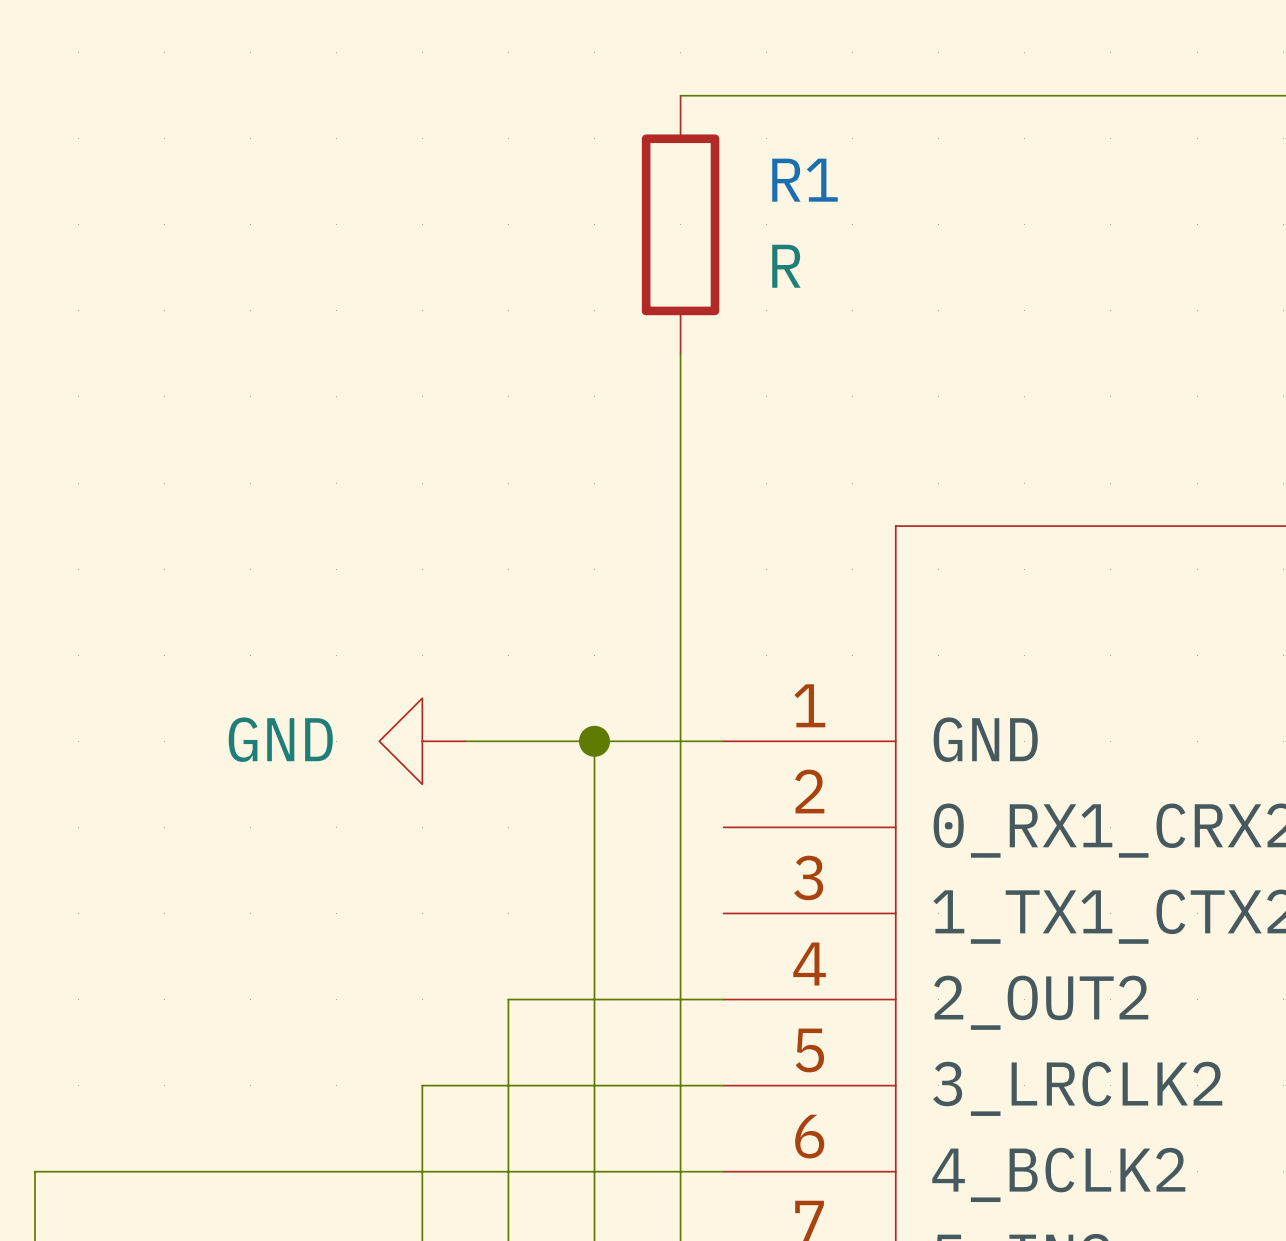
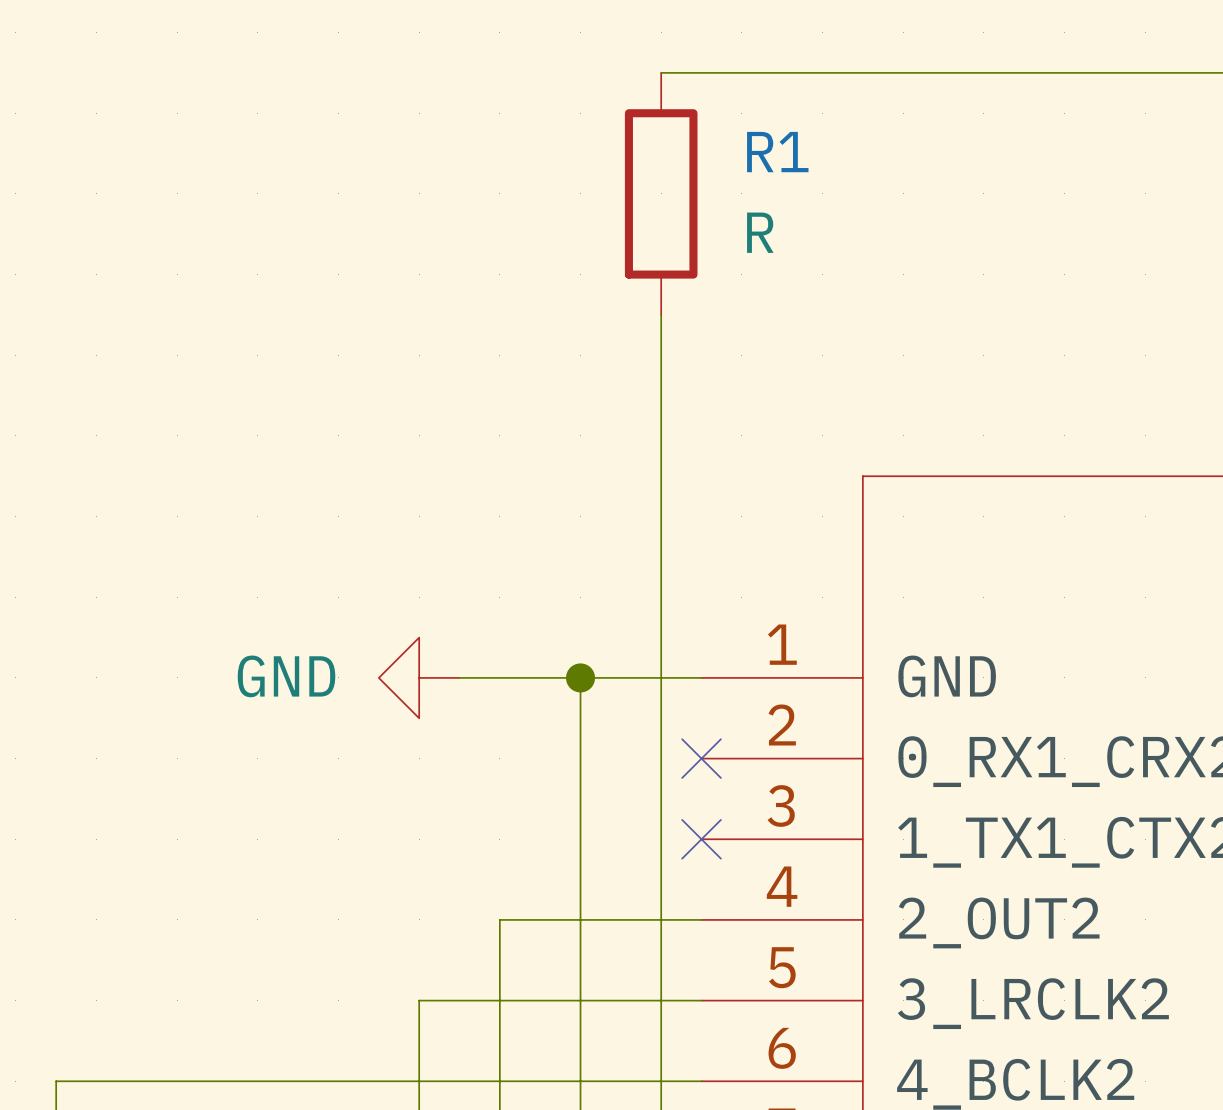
no-connect mark: none -> (701, 758)
no-connect mark: none -> (701, 839)

